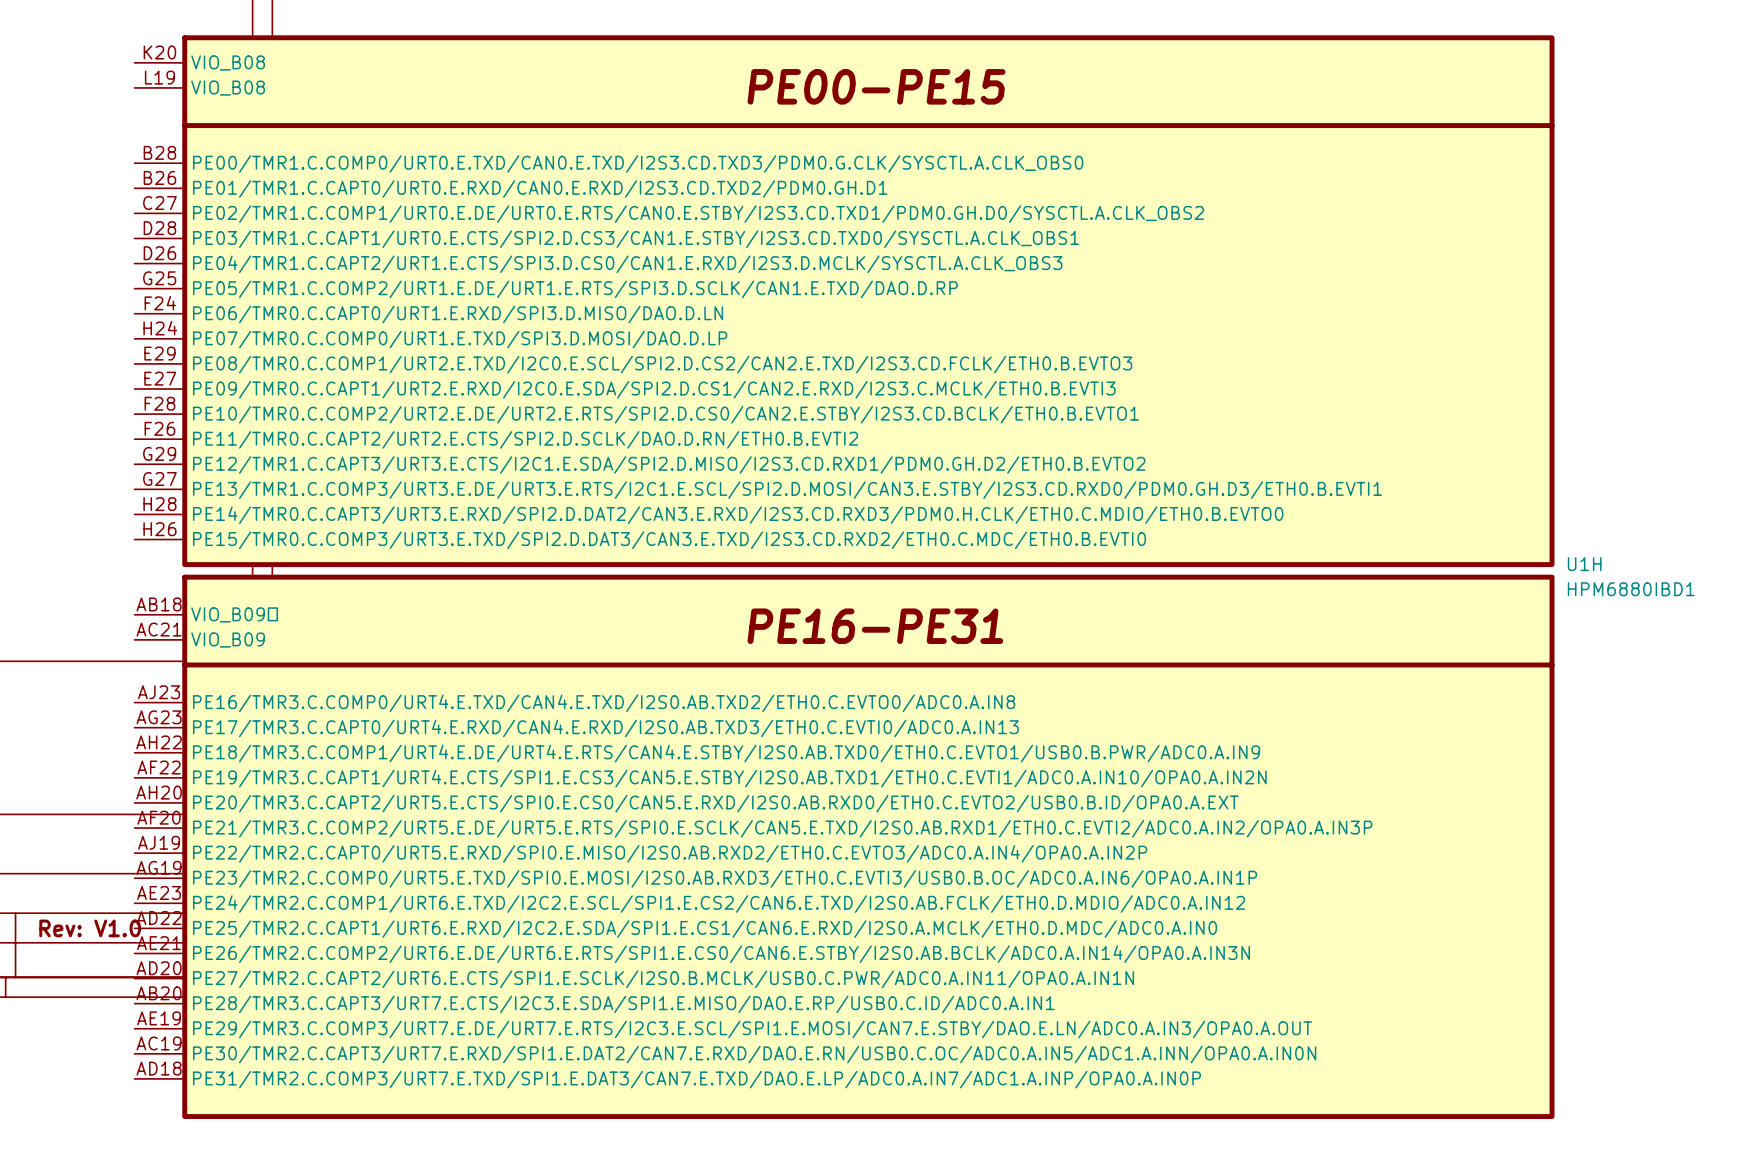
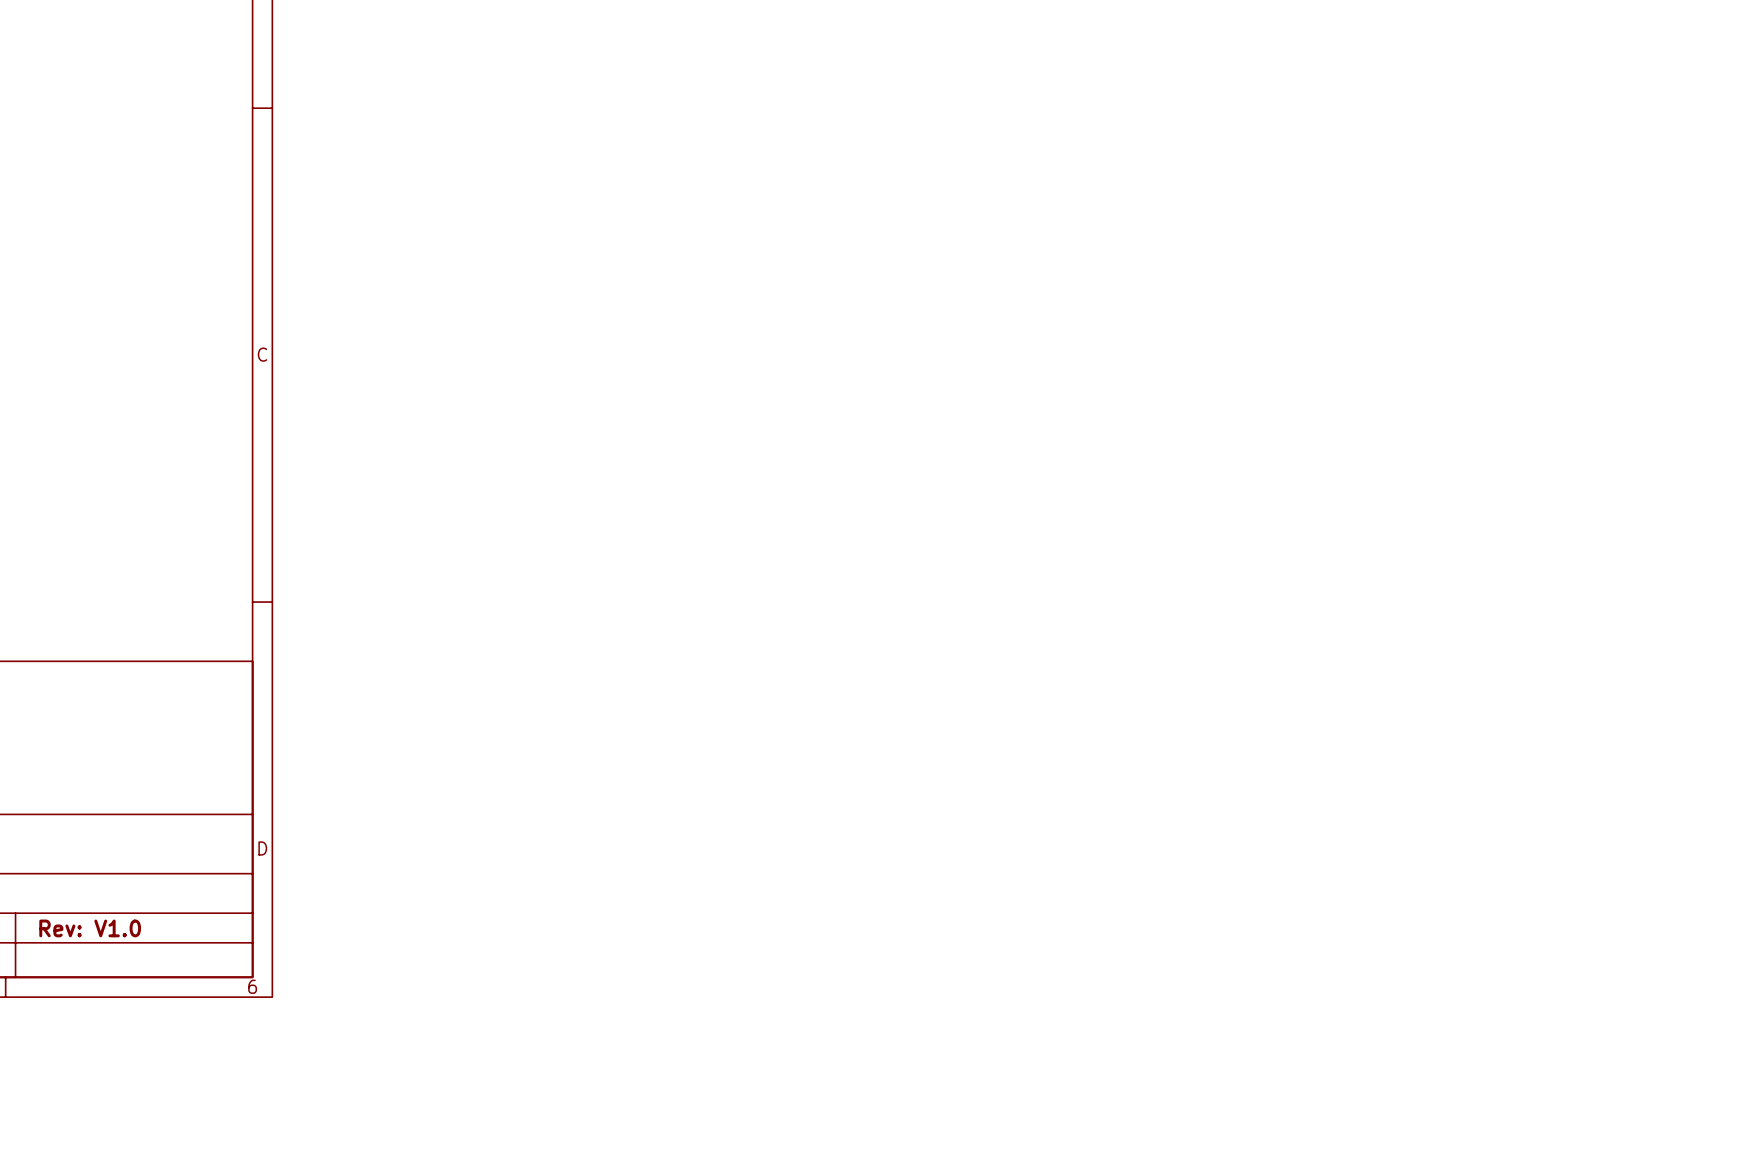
U1H: HPM6880IBD1 (844, 577) -> none

